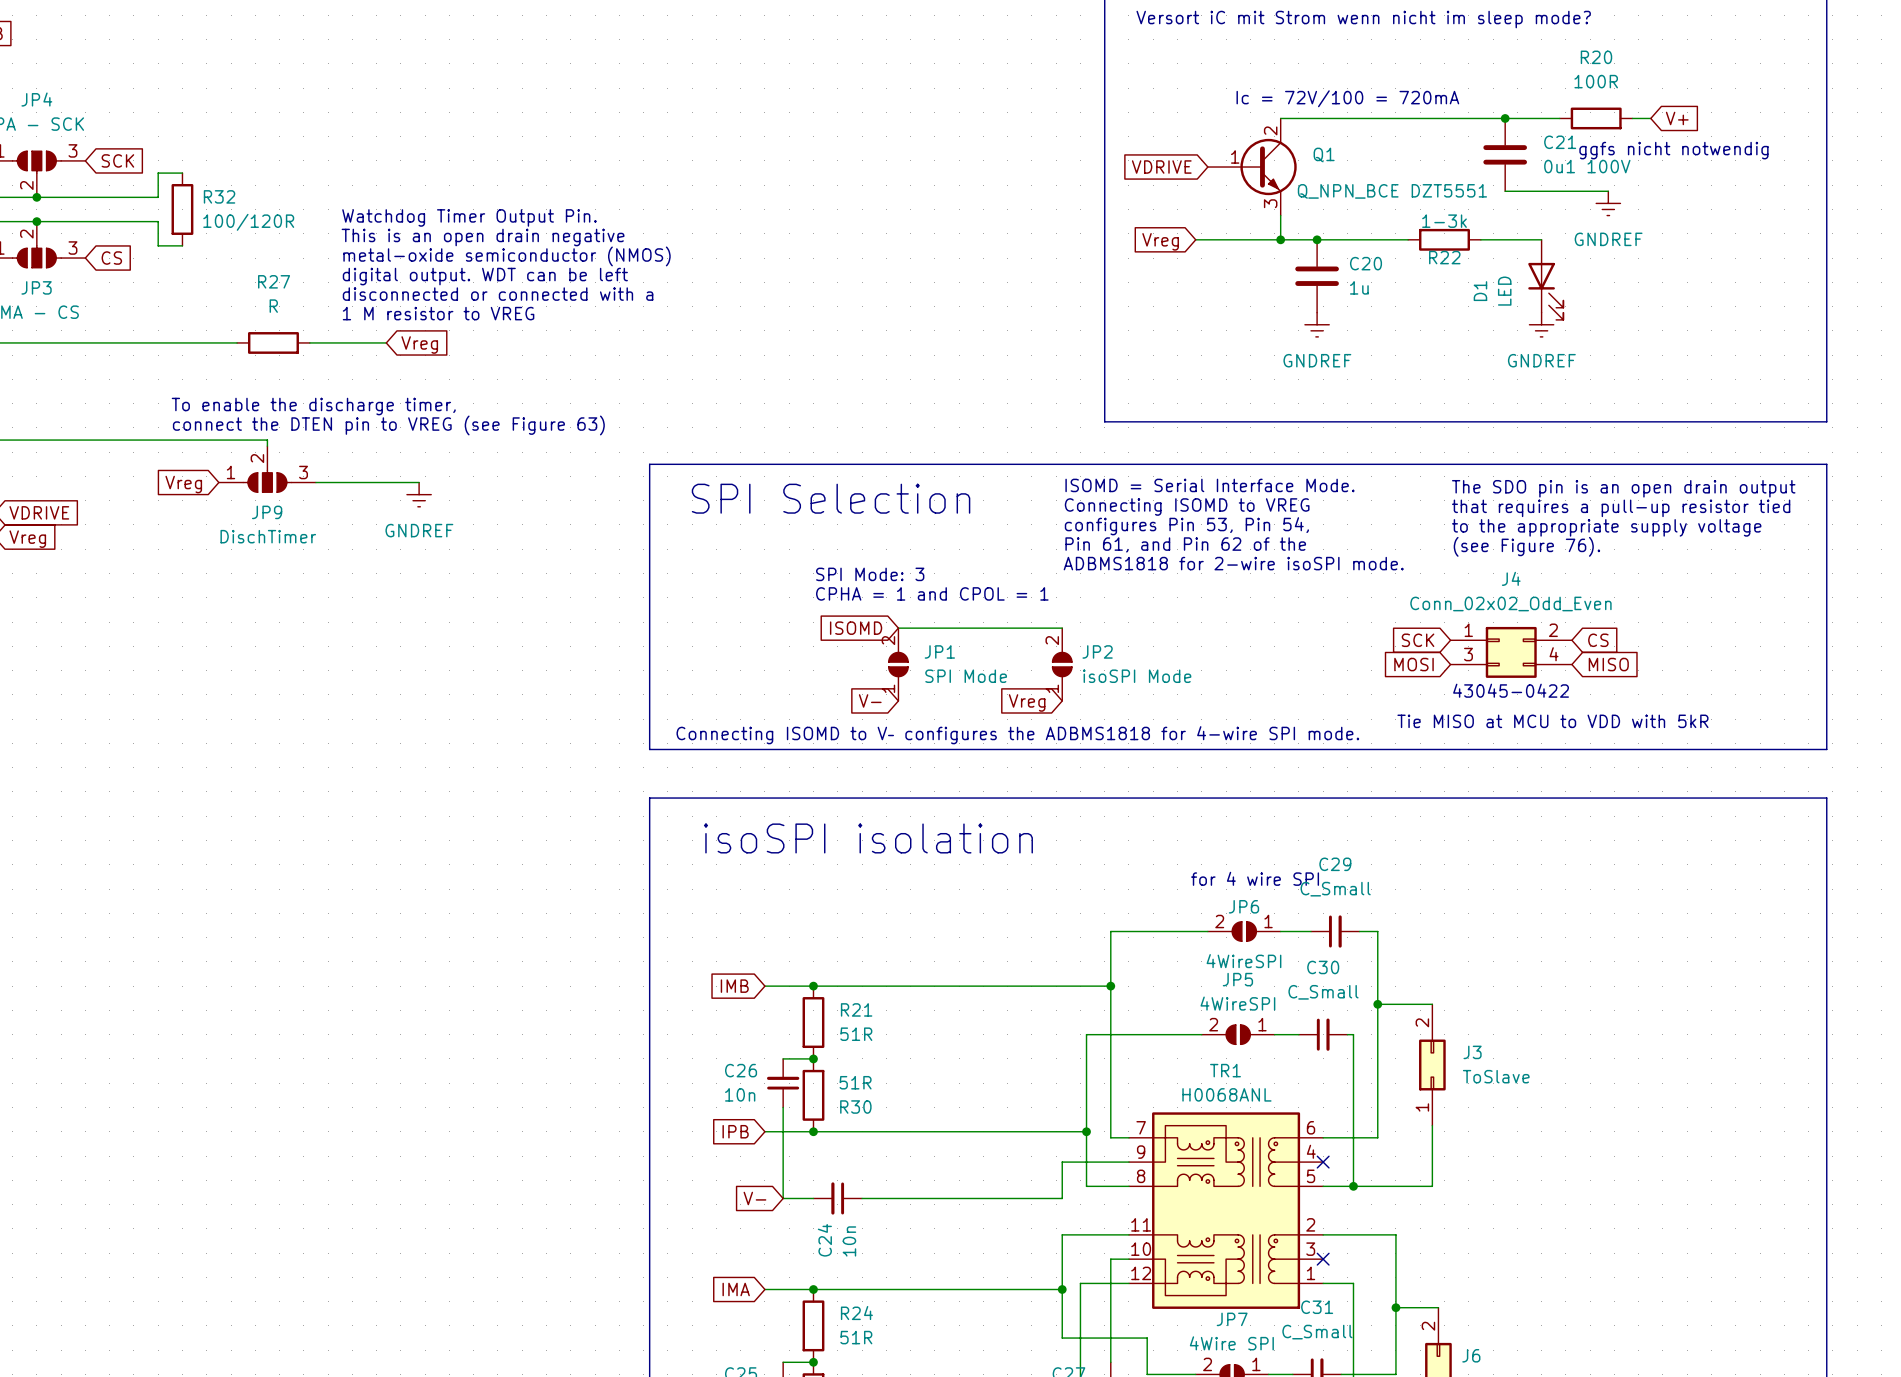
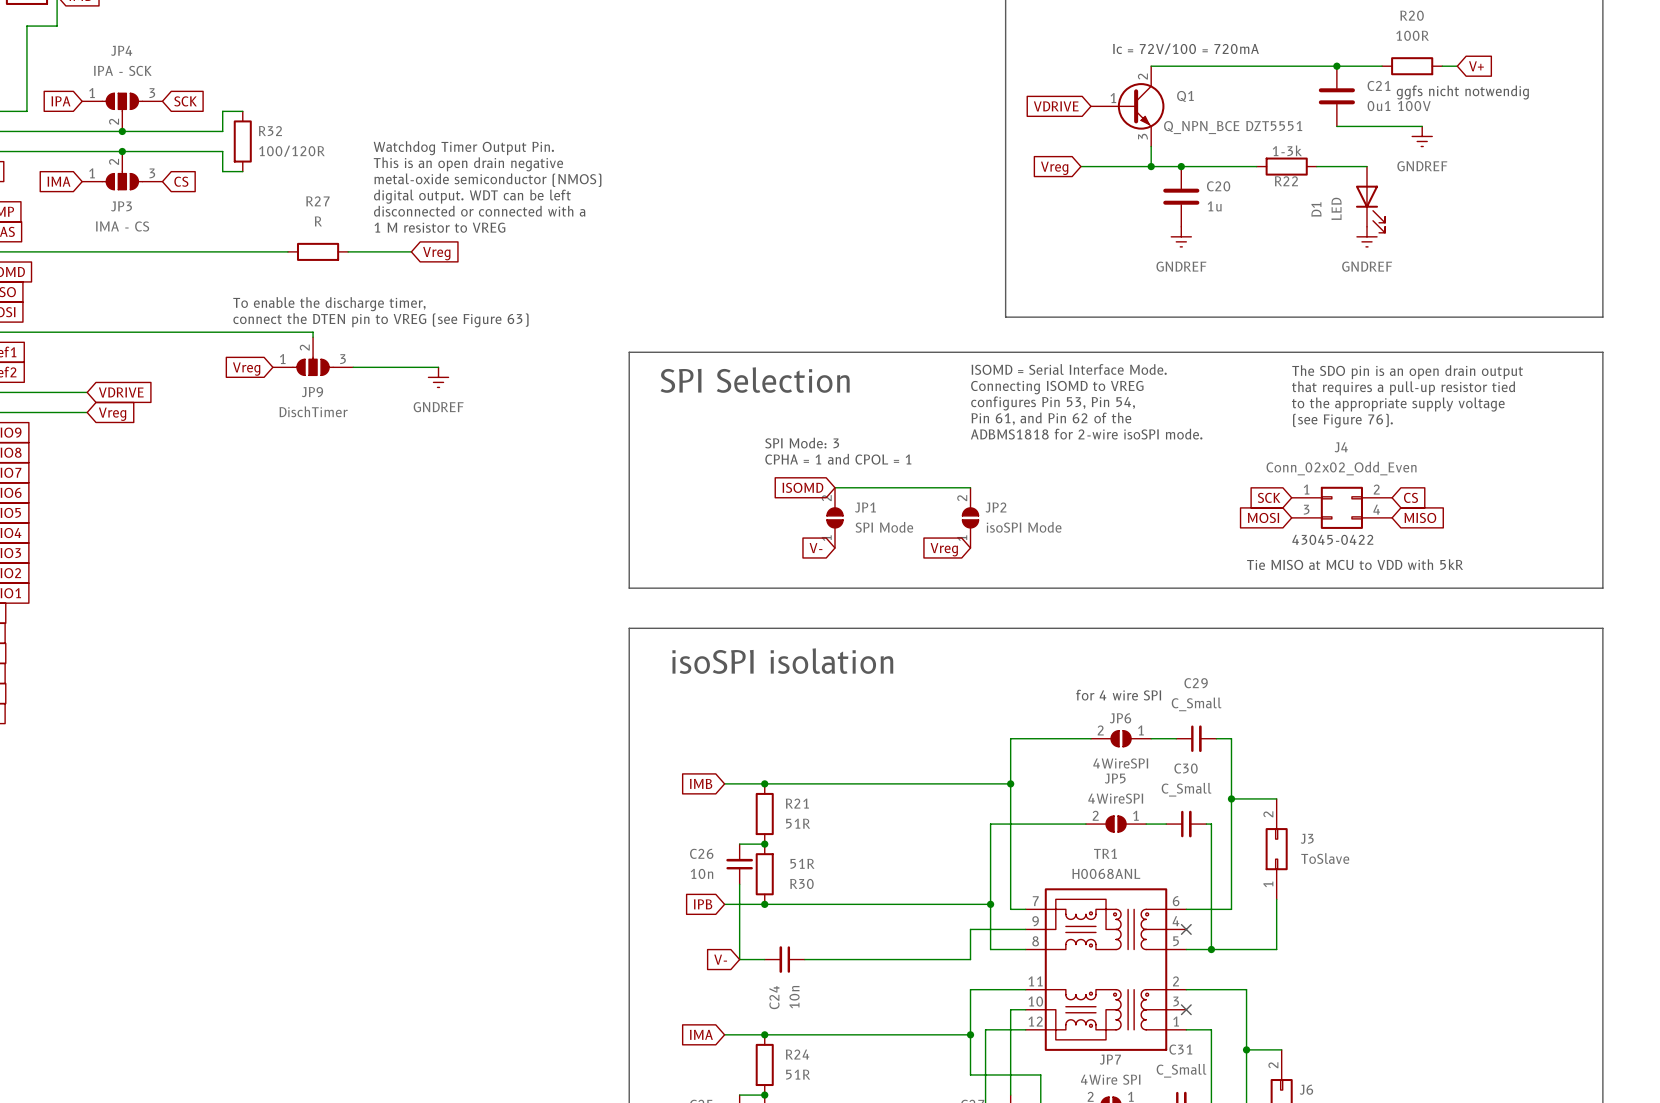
text: Connecting ISOMD to V– configures the ADBMS1818 for 4-wire SPI mode. (1017, 735) -> none

